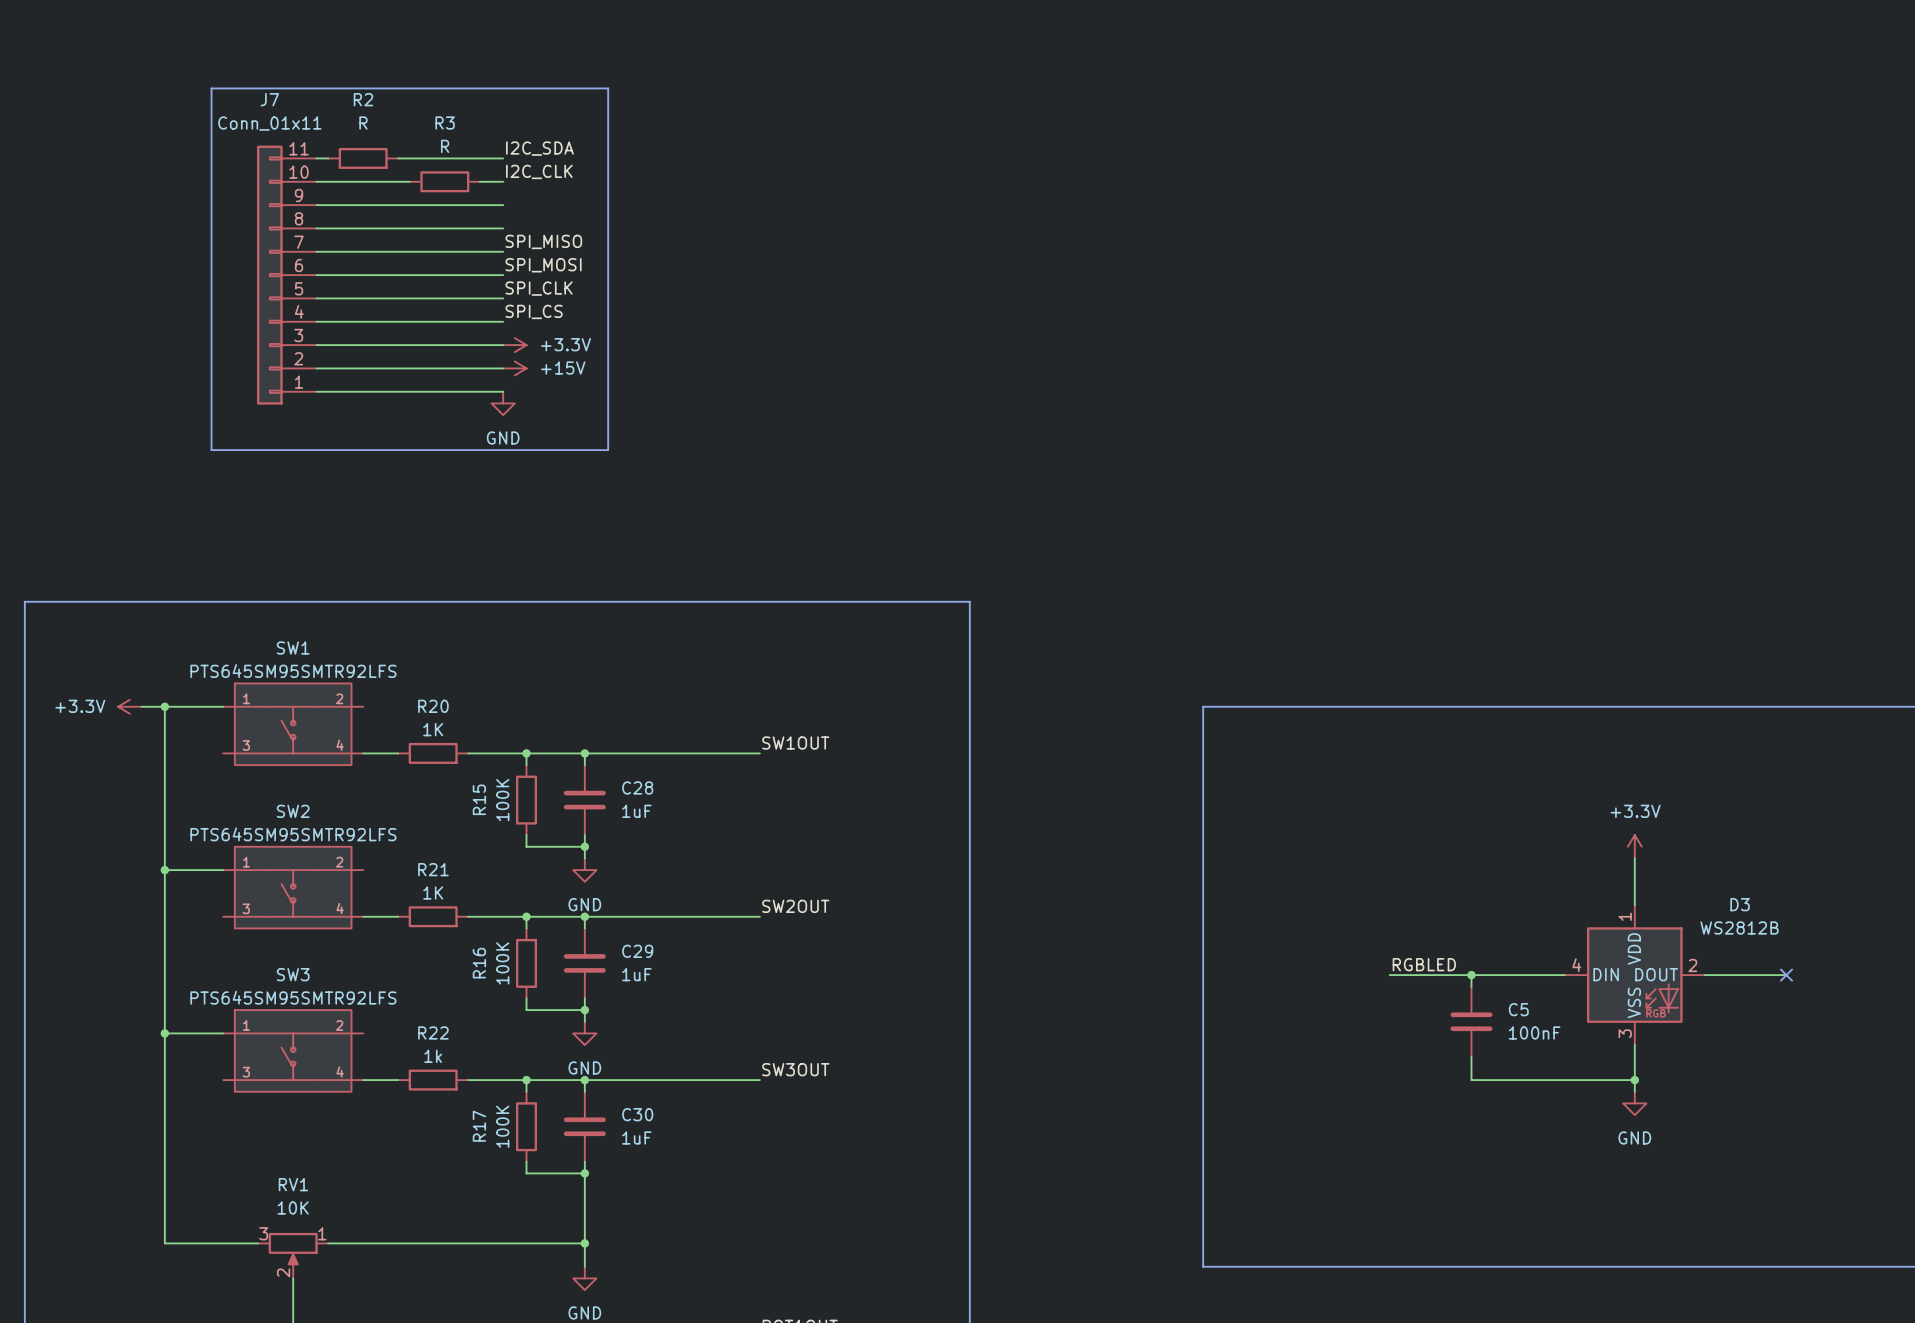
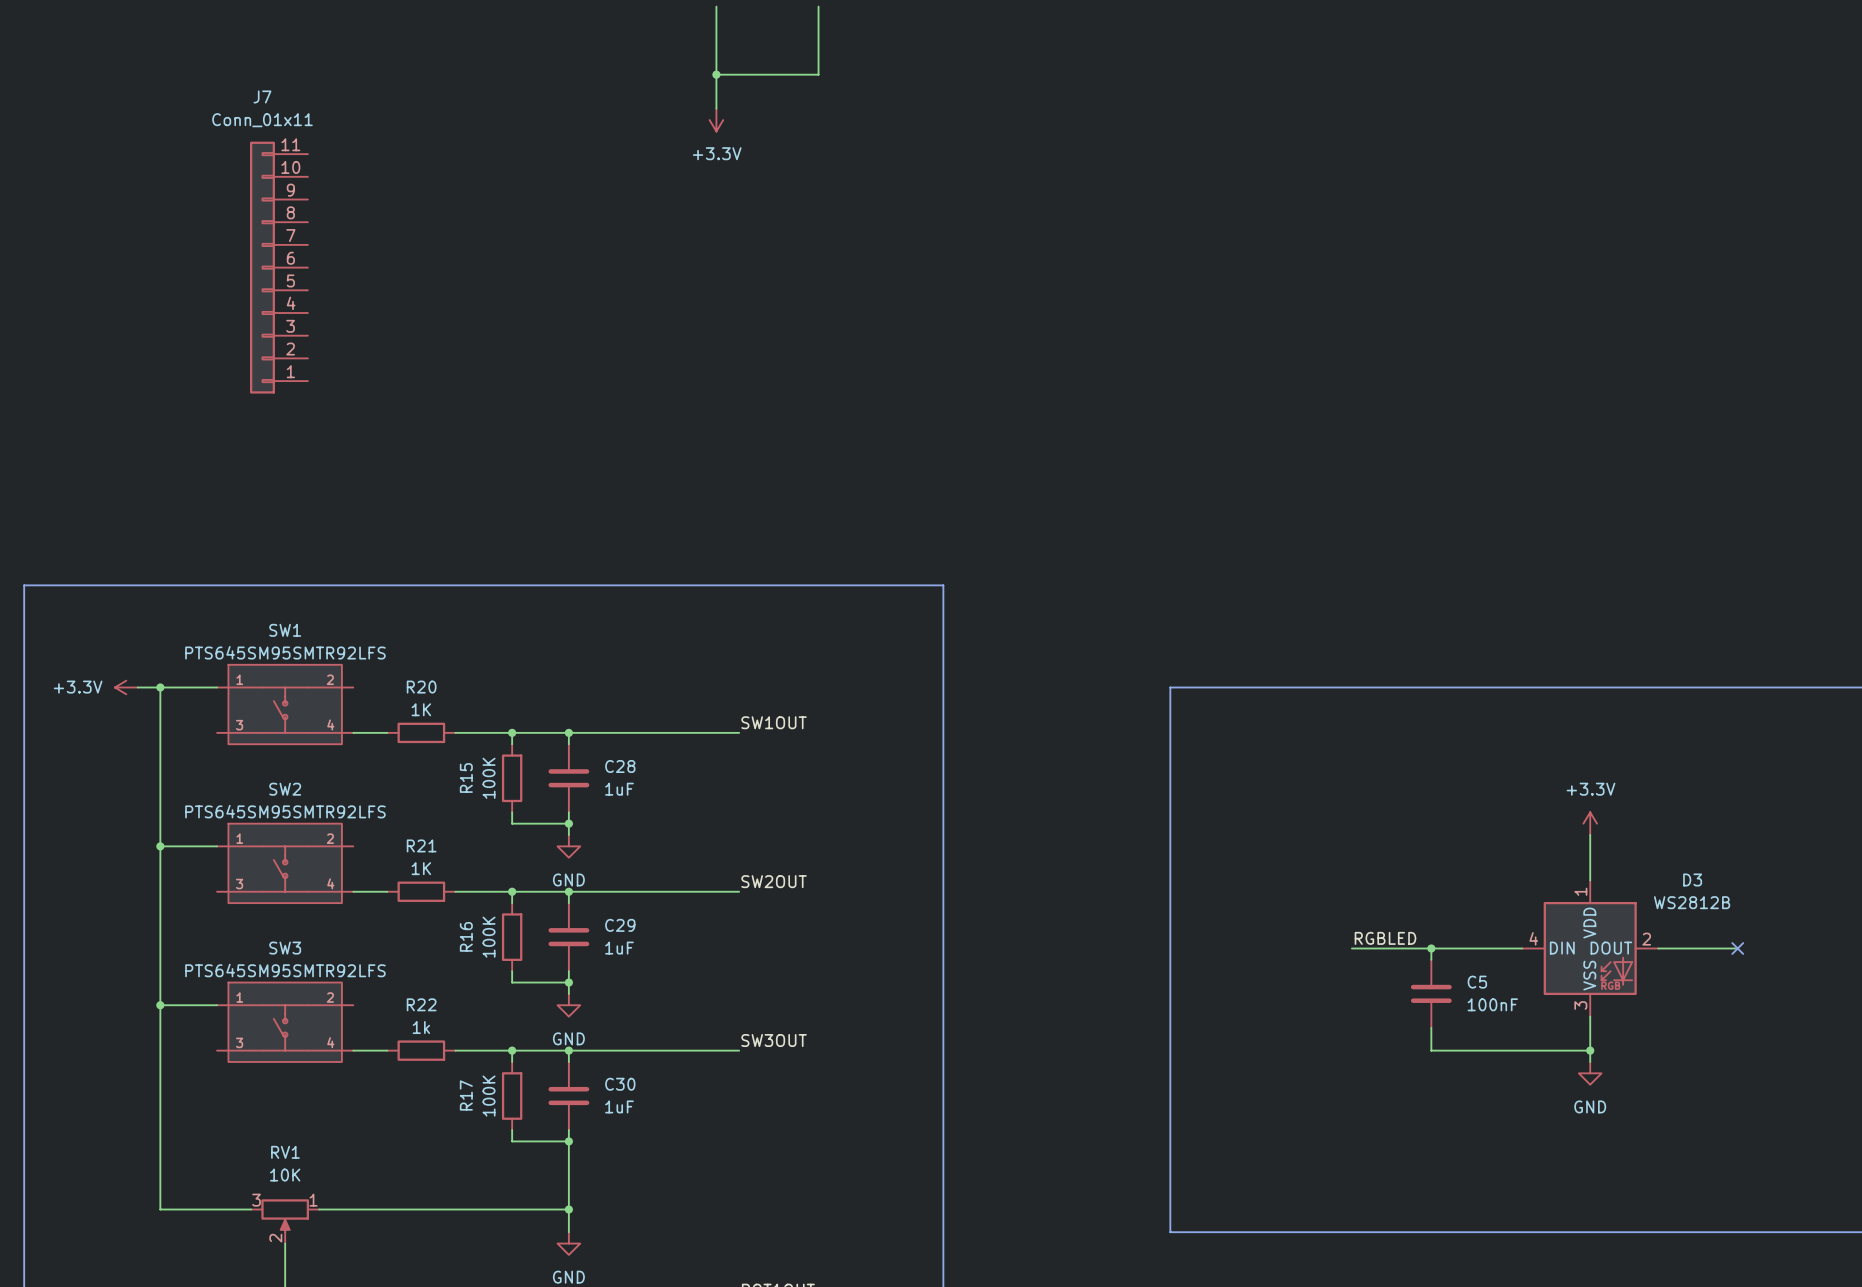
wire: none -> (716, 6) (716, 108)
wire: none -> (818, 6) (818, 74) (716, 74)
junction: none -> (716, 74)
line: (211, 88) (608, 88) (608, 450) (211, 450) (211, 88) -> none
power symbol: none -> +3.3V (716, 120)
label: I2C_SDA (539, 148) -> none
wire: (316, 158) (328, 158) -> none
R2: R (363, 158) -> none
wire: (398, 158) (503, 158) -> none
label: I2C_CLK (539, 171) -> none
wire: (316, 181) (409, 181) -> none
R3: R (444, 181) -> none
wire: (479, 181) (503, 181) -> none
wire: (316, 205) (503, 205) -> none
wire: (316, 228) (503, 228) -> none
label: SPI_MISO (543, 241) -> none
wire: (316, 251) (503, 251) -> none
label: SPI_MOSI (543, 265) -> none
wire: (316, 275) (503, 275) -> none
label: SPI_CLK (539, 288) -> none
wire: (316, 298) (503, 298) -> none
label: SPI_CS (534, 311) -> none
wire: (316, 321) (503, 321) -> none
wire: (316, 345) (503, 345) -> none
power symbol: +3.3V (514, 345) -> none
wire: (316, 368) (503, 368) -> none
power symbol: +15V (514, 368) -> none
wire: (316, 391) (503, 391) -> none
power symbol: GND (503, 403) -> none

